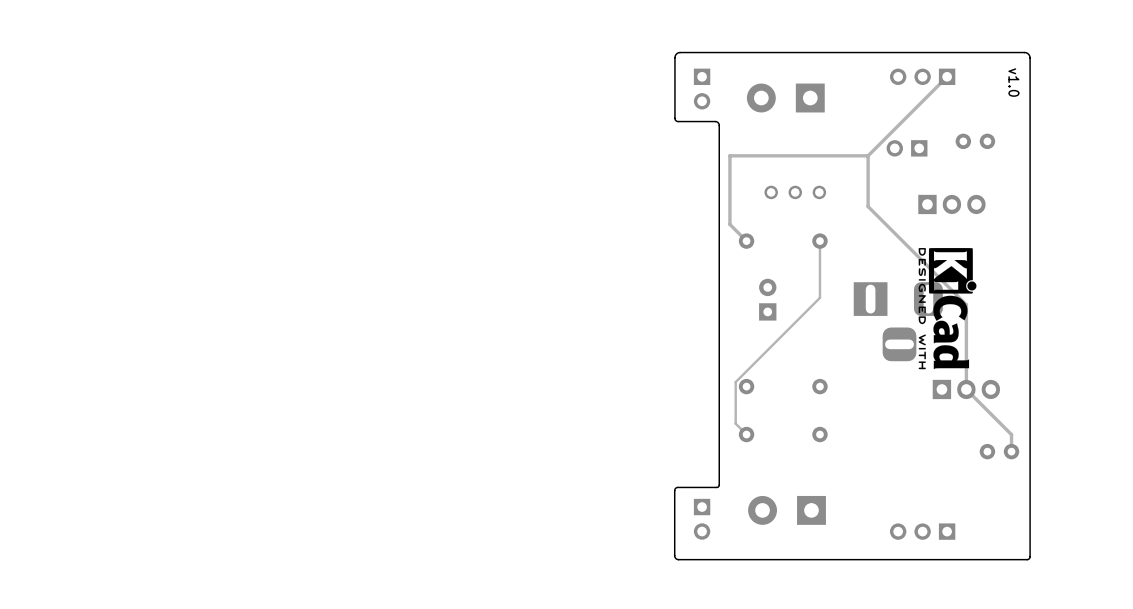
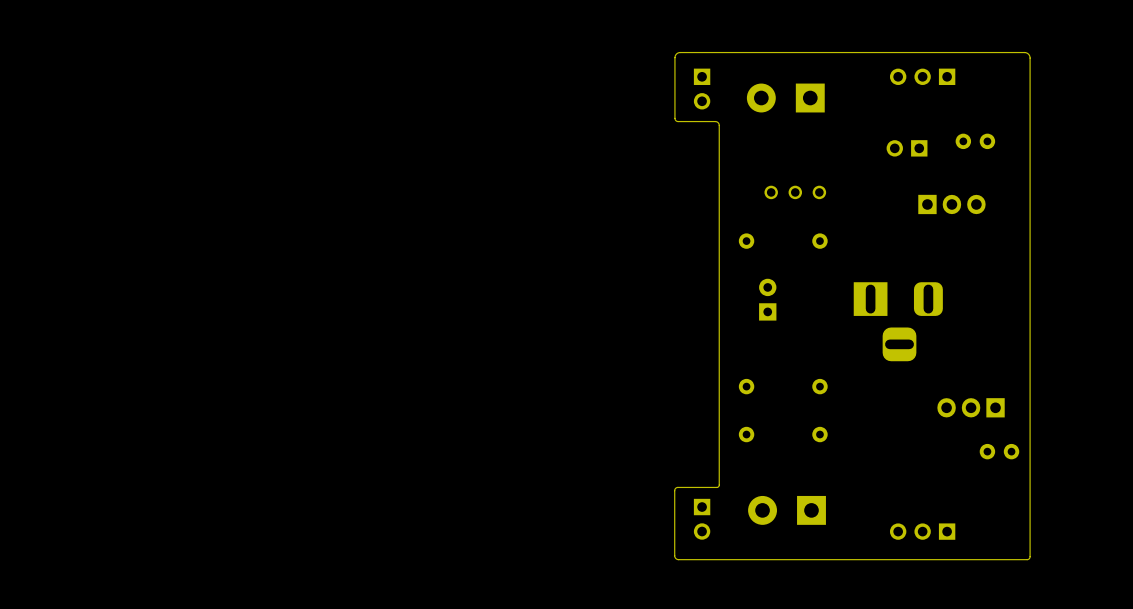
track: (947, 76) (868, 155) -> none
text: v1.0 (1013, 82) -> none
track: (868, 155) (729, 155) (729, 224) (746, 241) -> none
track: (868, 155) (868, 206) (966, 304) (966, 389) (1011, 434) (1011, 451) -> none
track: (819, 241) (819, 297) (735, 382) (735, 423) (746, 434) -> none
drawing: [918, 248, 977, 370] -> none
part rotation: 0° (966, 389) -> 180° (971, 407)

